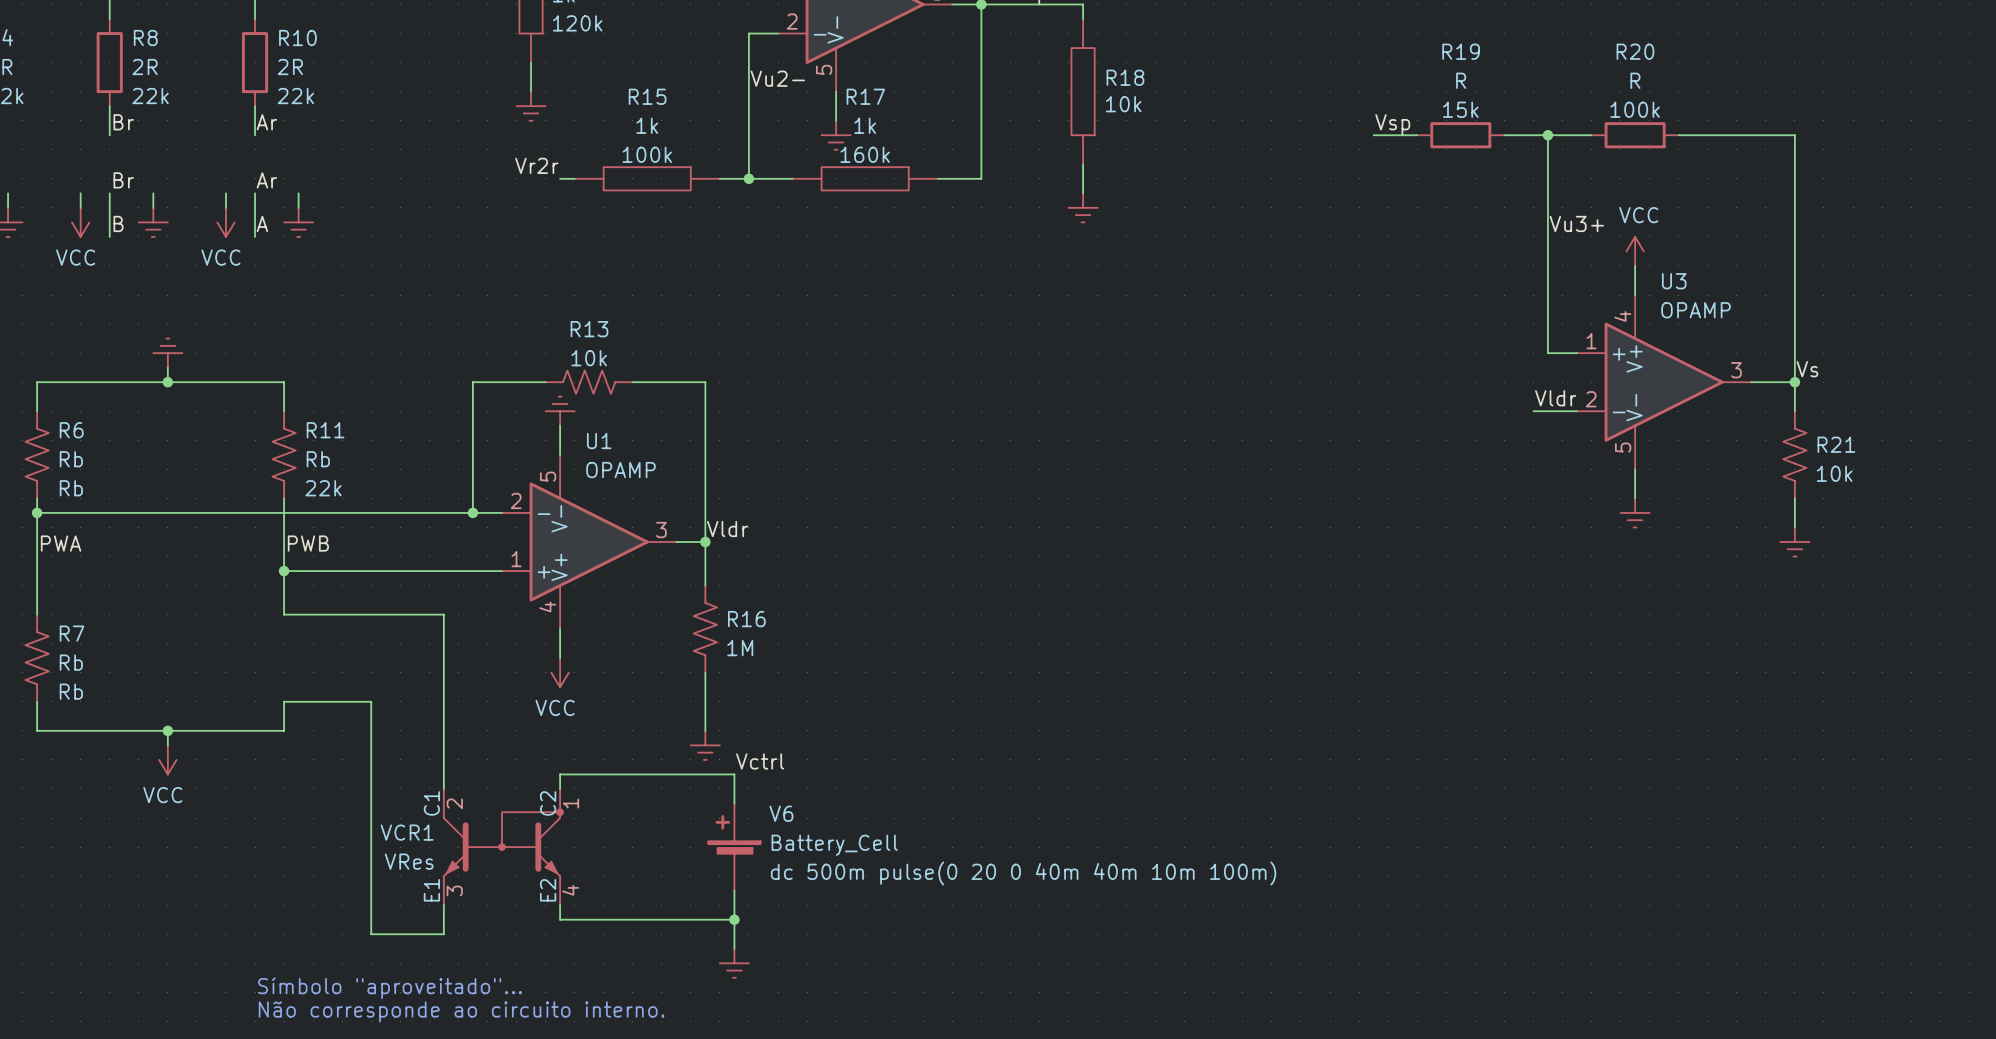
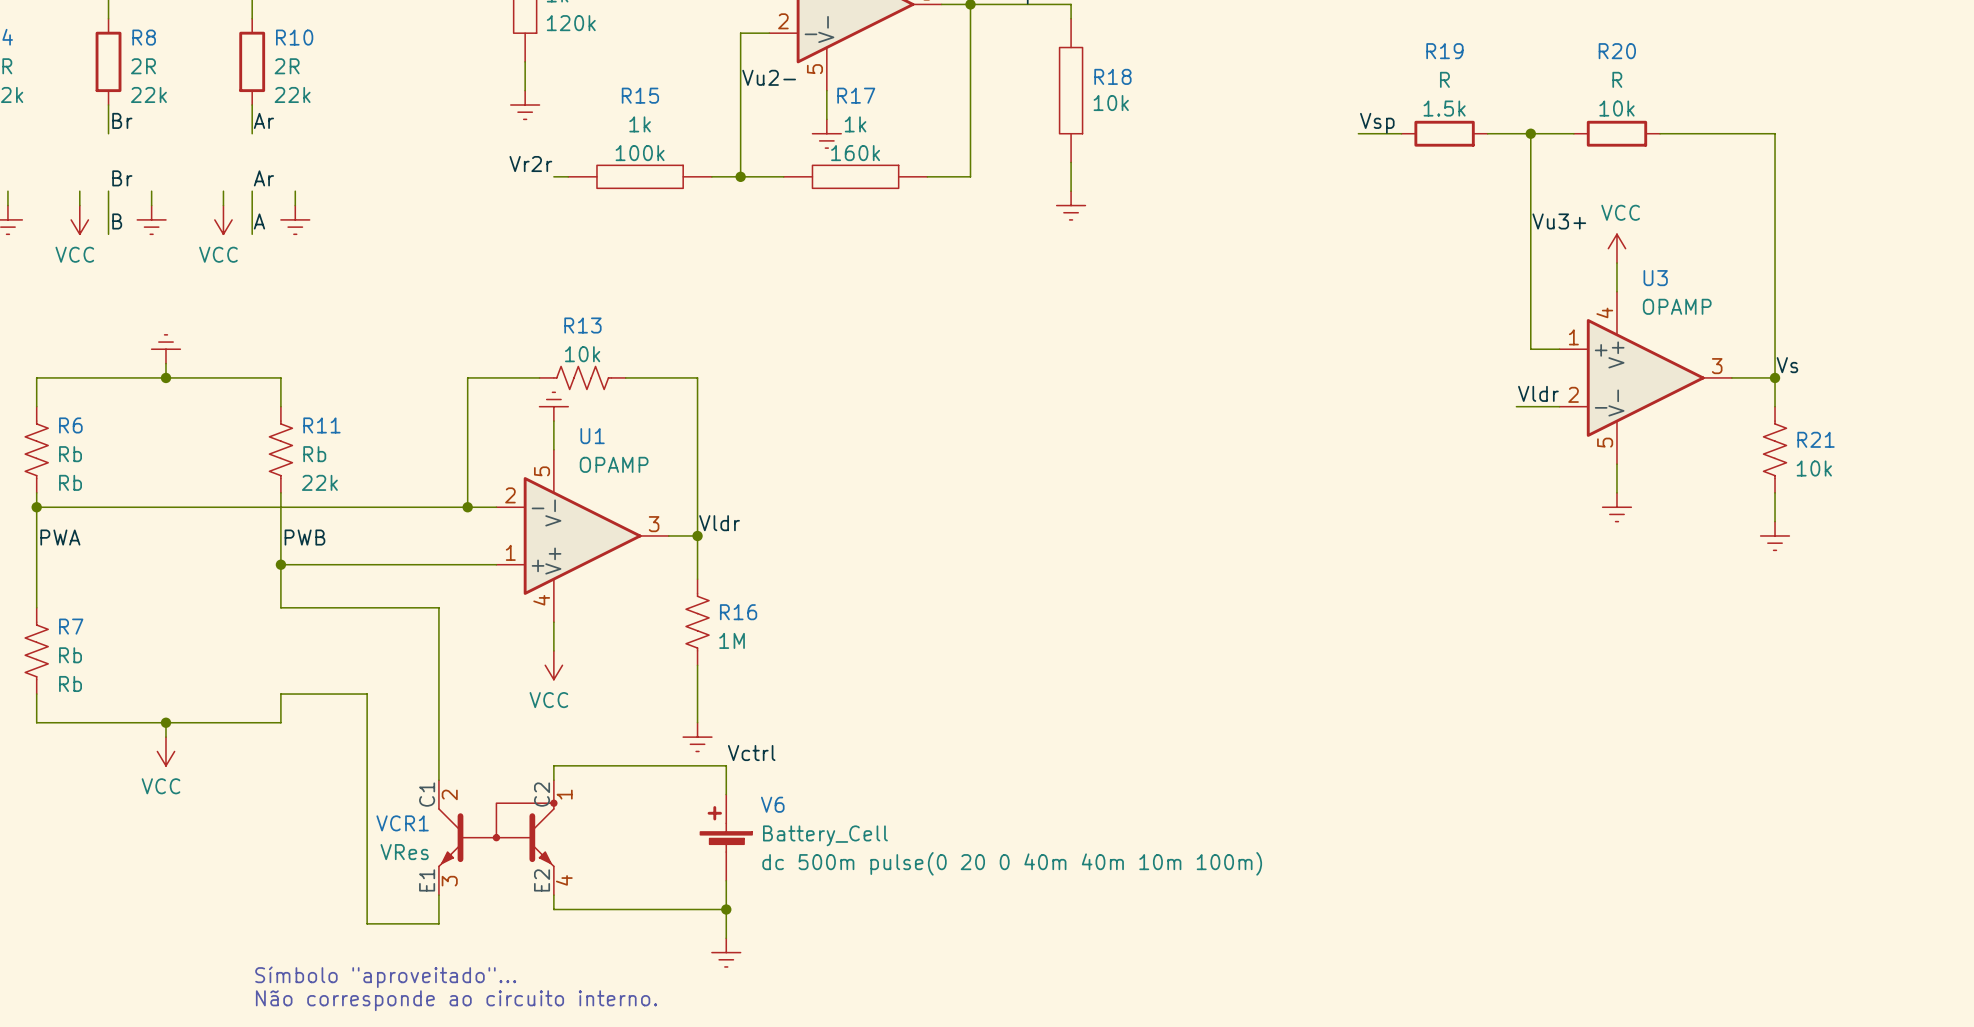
R19 text: 15k (1460, 109) -> 1.5k (1444, 108)
R20 text: 100k (1635, 109) -> 10k (1616, 108)

